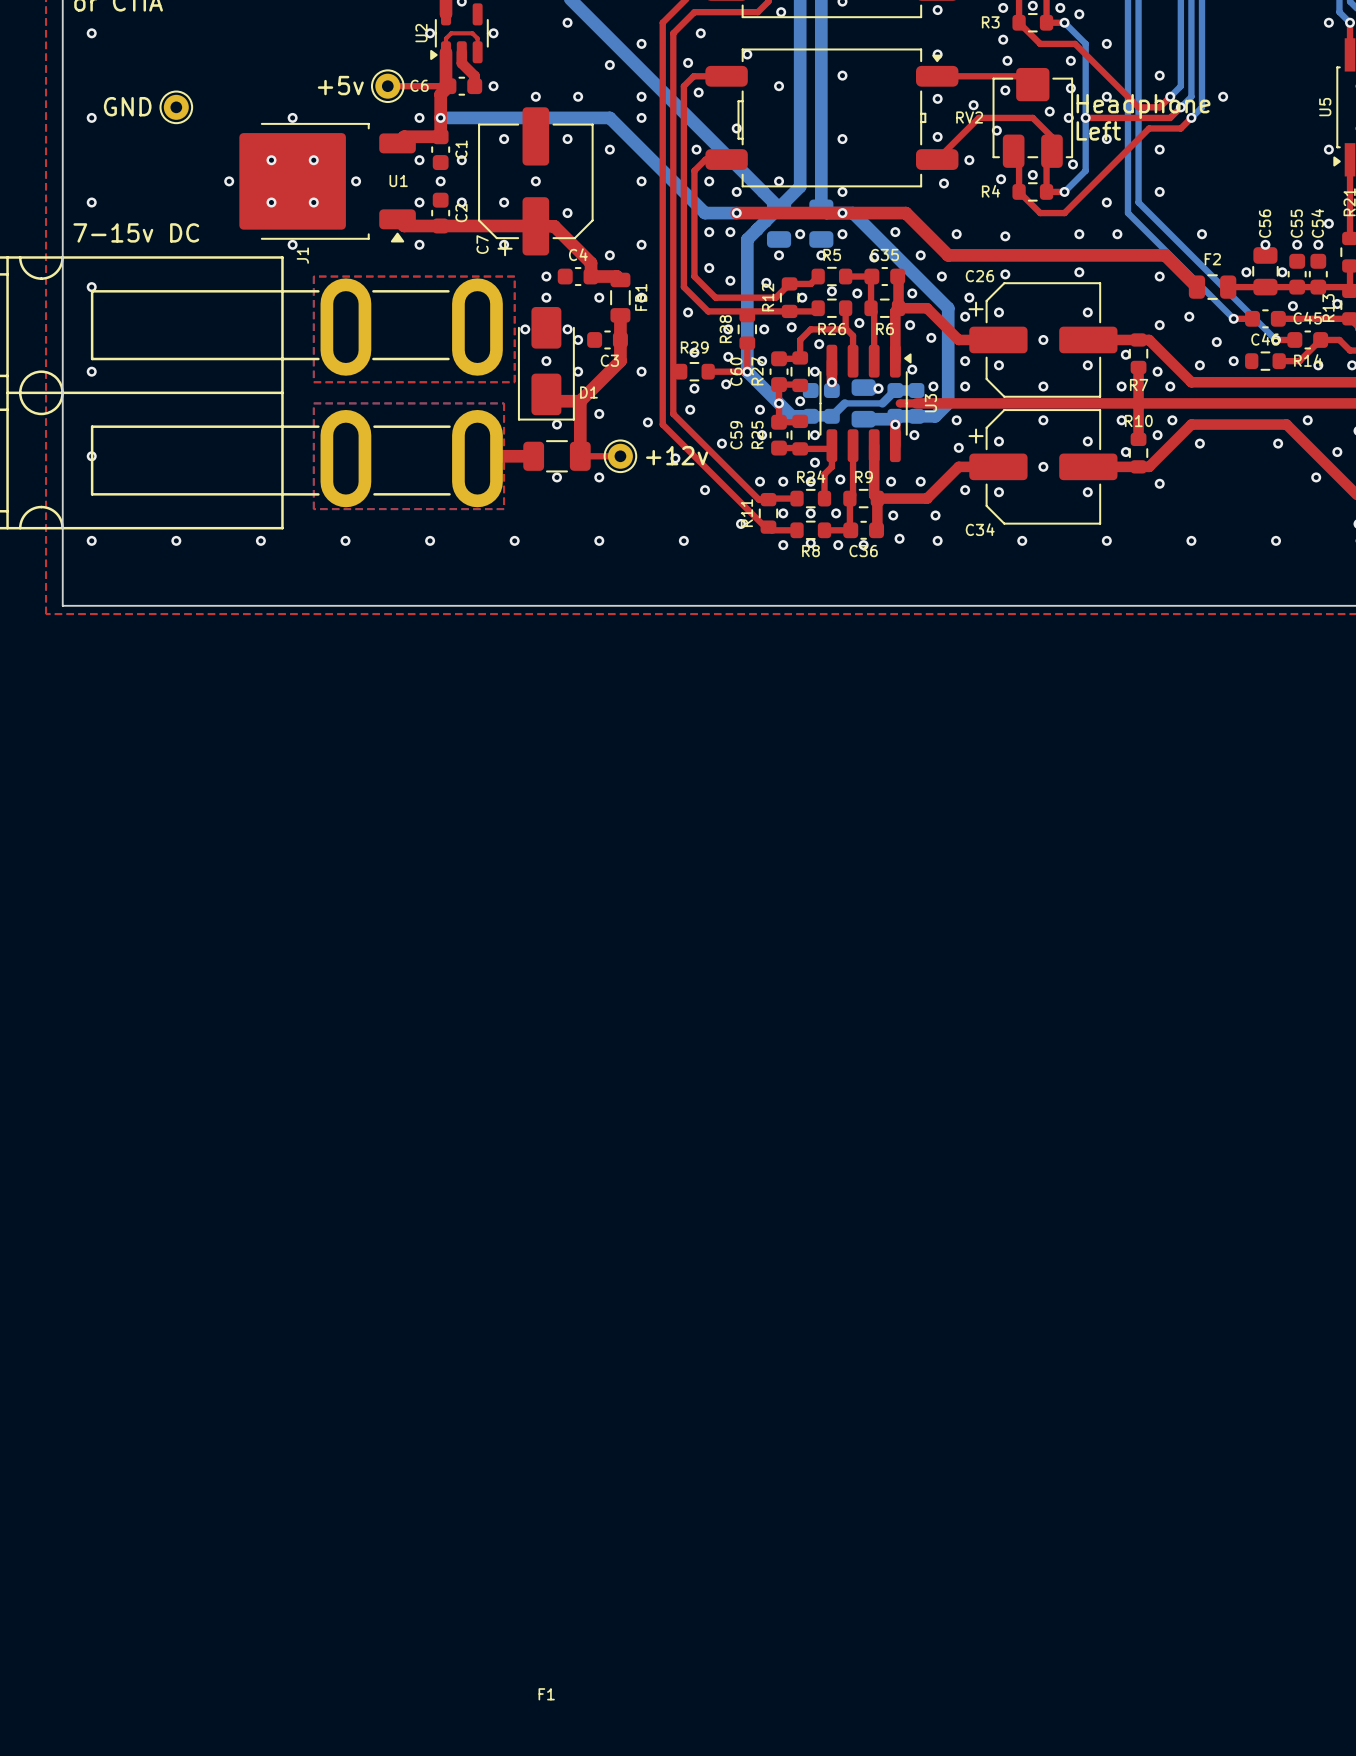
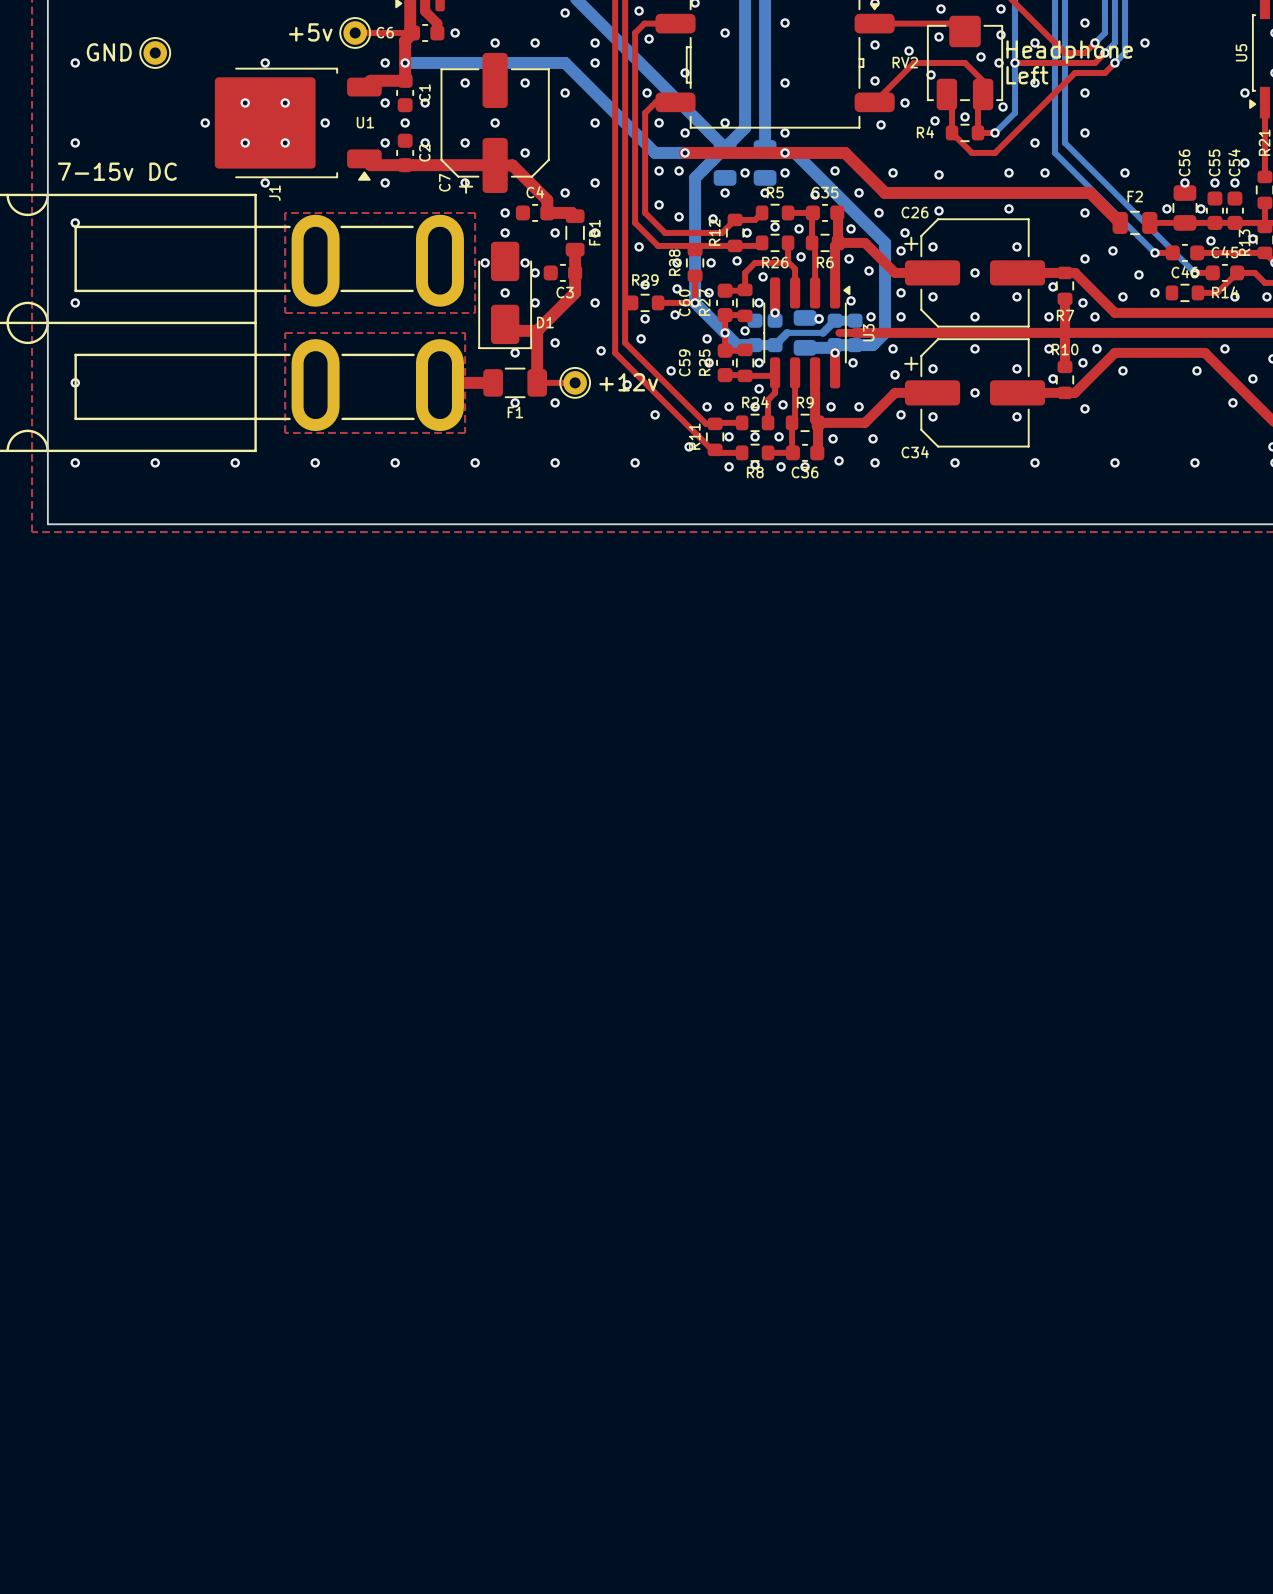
F1 name position: F1 (546, 1694) -> F1 (515, 412)

